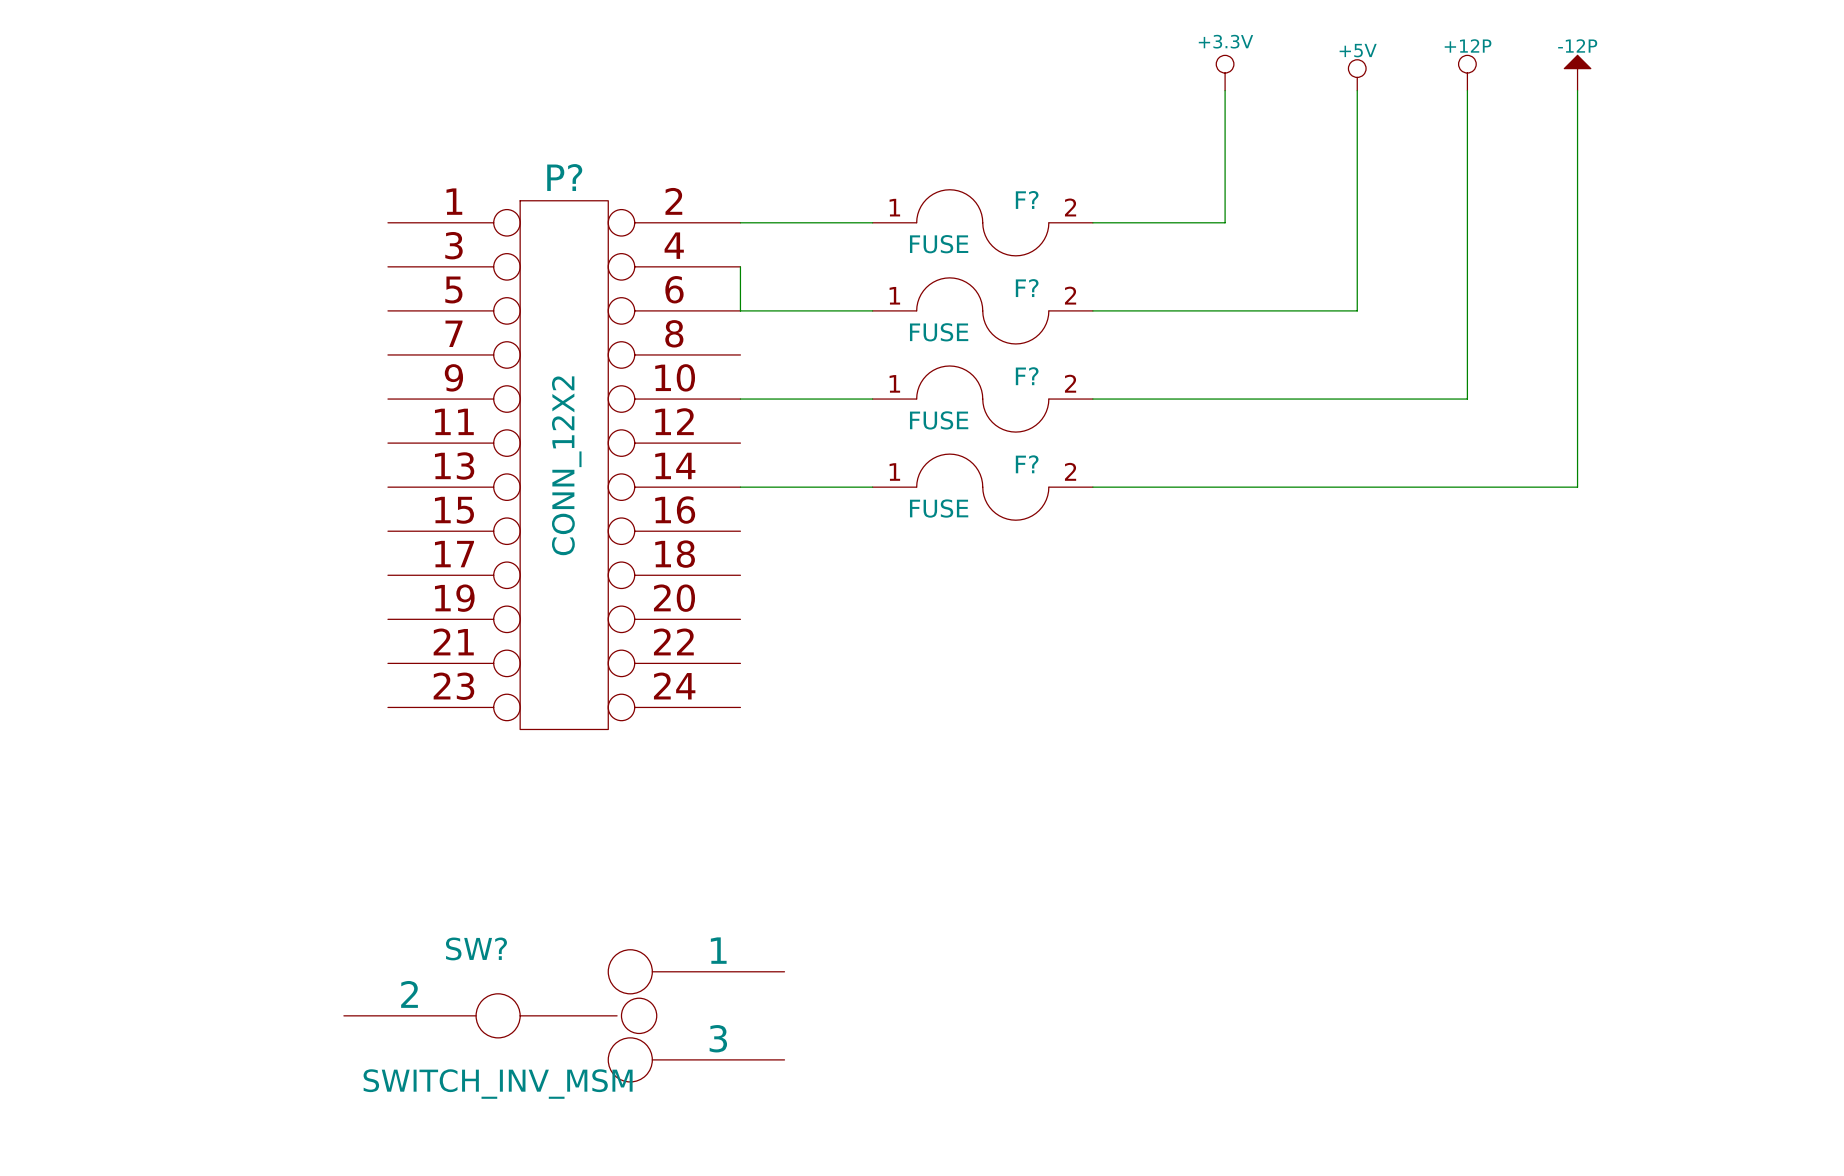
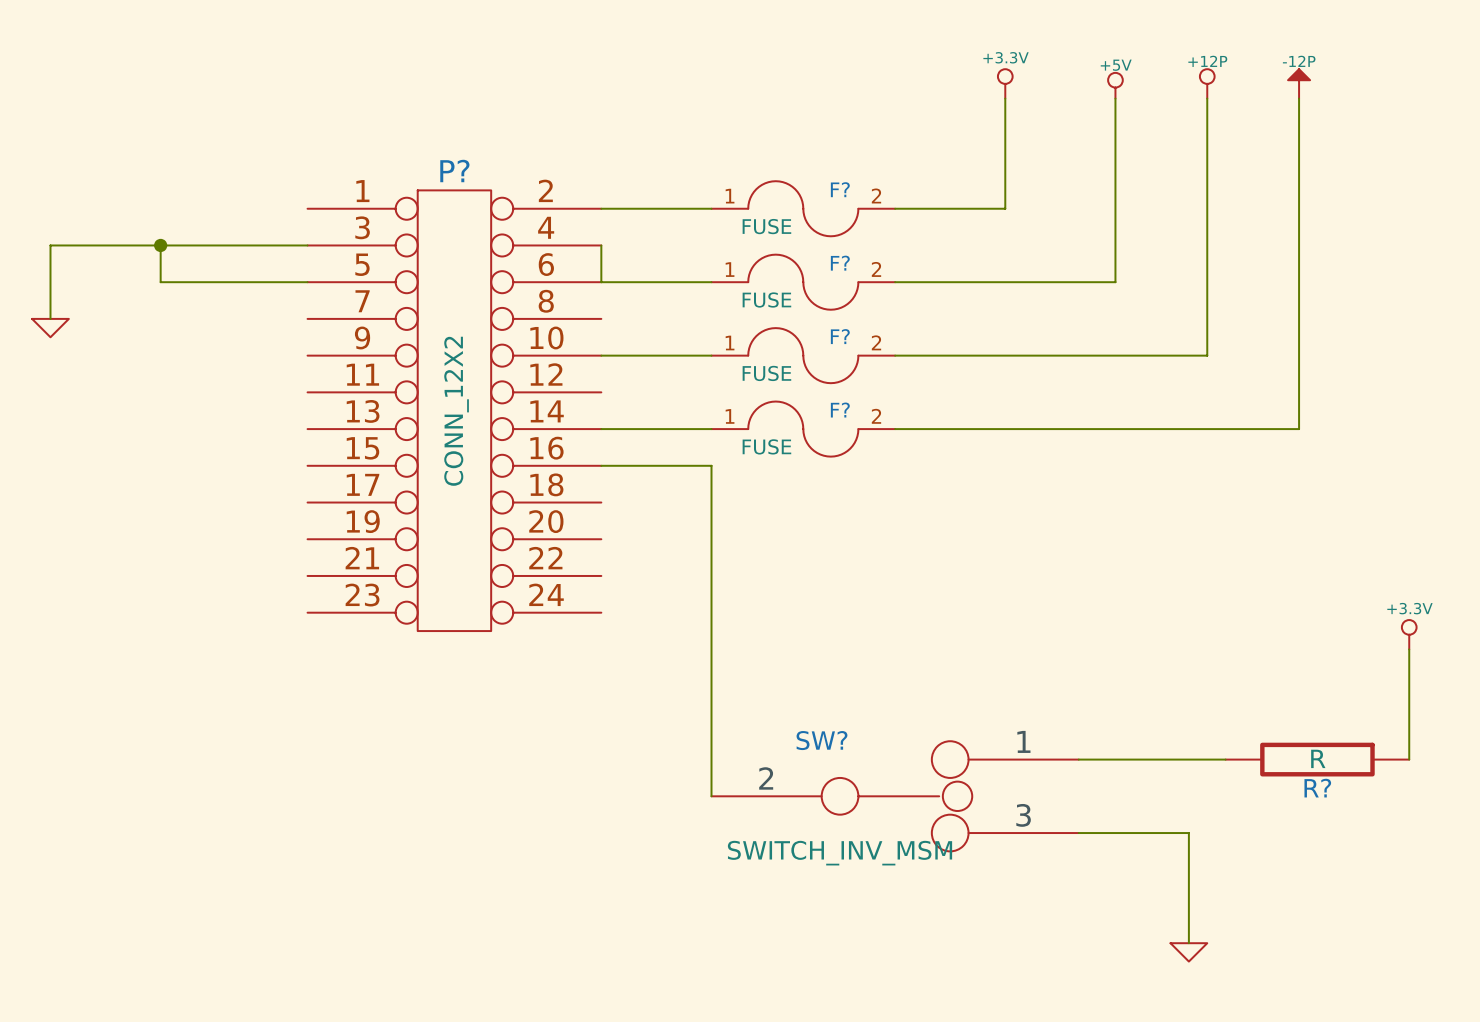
wire: none -> (160, 245) (160, 282) (307, 282)
junction: none -> (160, 245)
wire: none -> (307, 245) (50, 245) (50, 318)
power symbol: none -> (50, 328)
wire: none -> (601, 465) (711, 465) (711, 796)
power symbol: none -> +3.3V (1409, 634)
wire: none -> (1409, 649) (1409, 759)
wire: none -> (1078, 759) (1225, 759)
R?: none -> R (1317, 759)
SW?: none -> SWITCH_INV_MSM (895, 796)
wire: none -> (1078, 833) (1188, 833) (1188, 943)
SW?: SWITCH_INV_MSM (564, 1015) -> none
power symbol: none -> (1188, 952)

